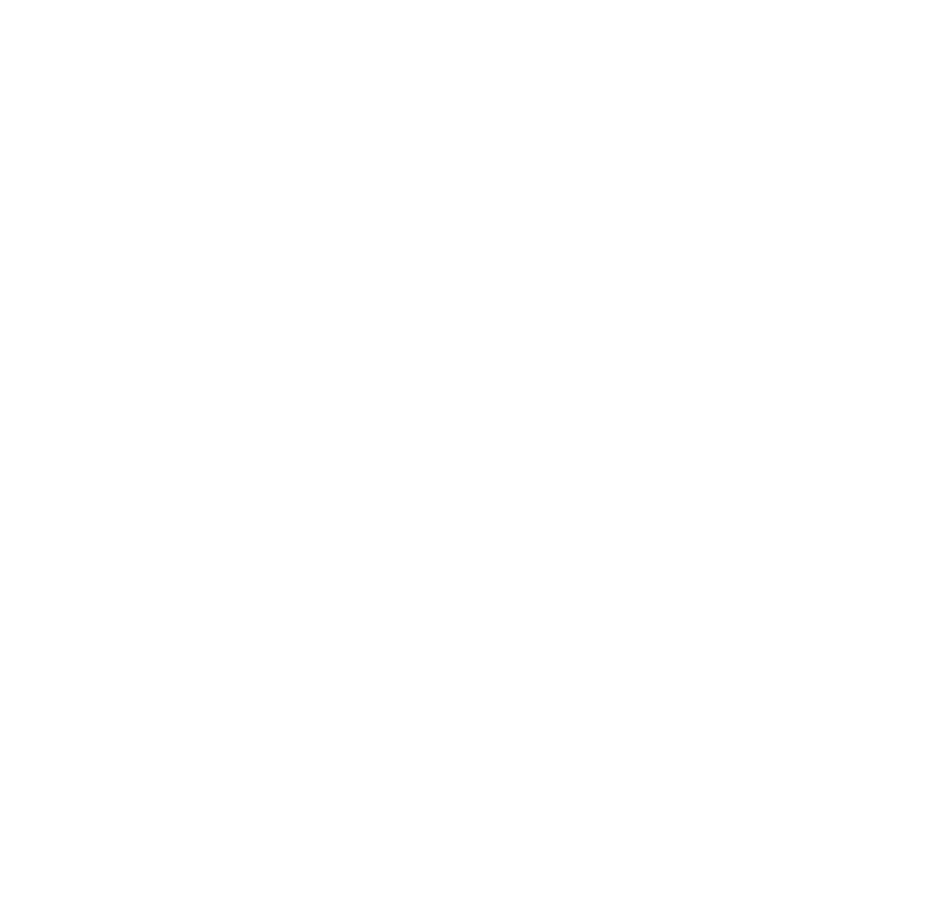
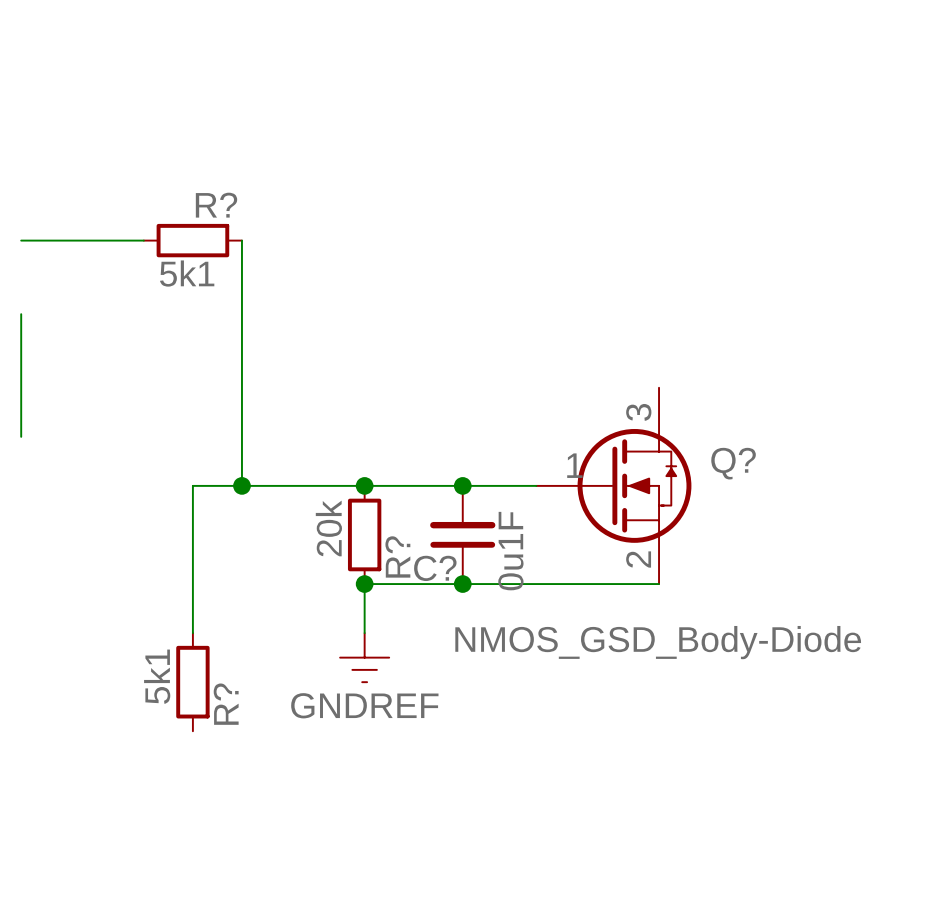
wire: none -> (21, 240) (143, 240)
R?: none -> 5k1 (192, 240)
wire: none -> (241, 240) (241, 485)
wire: none -> (21, 314) (21, 436)
junction: none -> (241, 485)
junction: none -> (364, 485)
junction: none -> (462, 485)
wire: none -> (536, 485) (192, 485) (192, 633)
Q?: none -> NMOS_GSD_Body-Diode (613, 485)
R?: none -> 20k (364, 534)
C?: none -> 0u1F (462, 534)
junction: none -> (364, 584)
junction: none -> (462, 584)
wire: none -> (659, 584) (364, 584) (364, 633)
power symbol: none -> GNDREF (364, 657)
R?: none -> 5k1 (192, 682)

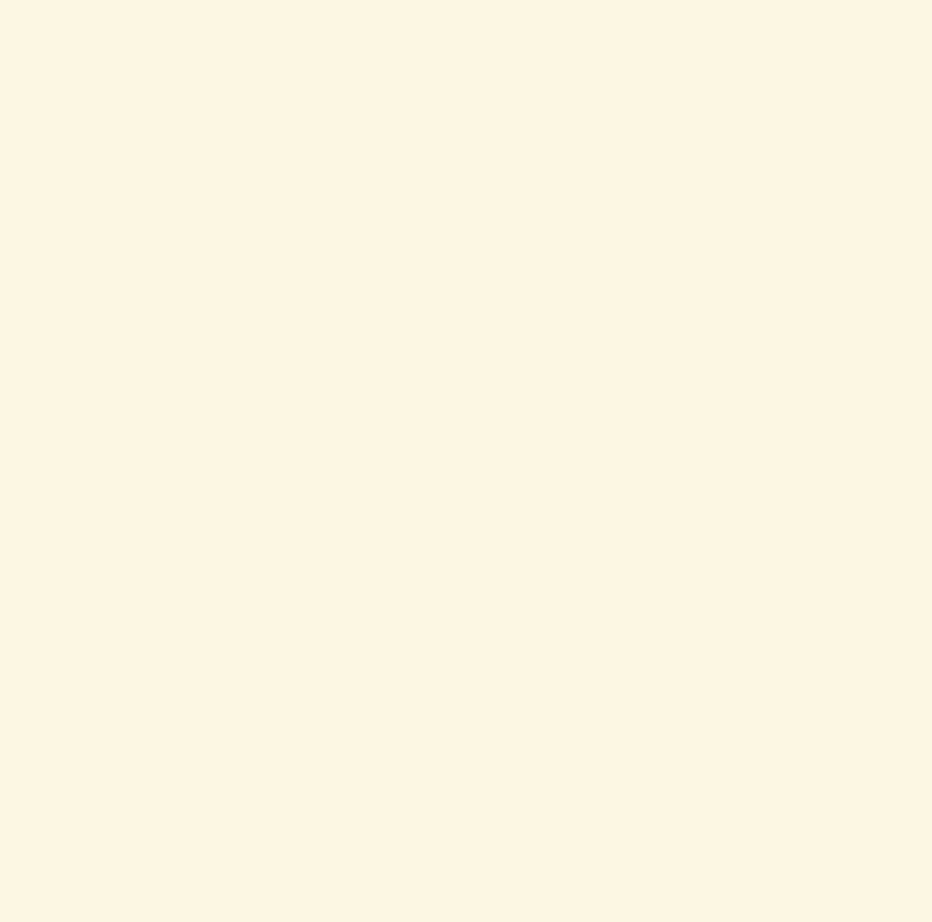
wire: (21, 240) (143, 240) -> none
R?: 5k1 (192, 240) -> none
wire: (241, 240) (241, 485) -> none
wire: (21, 314) (21, 436) -> none
junction: (241, 485) -> none
junction: (364, 485) -> none
junction: (462, 485) -> none
wire: (536, 485) (192, 485) (192, 633) -> none
Q?: NMOS_GSD_Body-Diode (613, 485) -> none
R?: 20k (364, 534) -> none
C?: 0u1F (462, 534) -> none
junction: (364, 584) -> none
junction: (462, 584) -> none
wire: (659, 584) (364, 584) (364, 633) -> none
power symbol: GNDREF (364, 657) -> none
R?: 5k1 (192, 682) -> none

